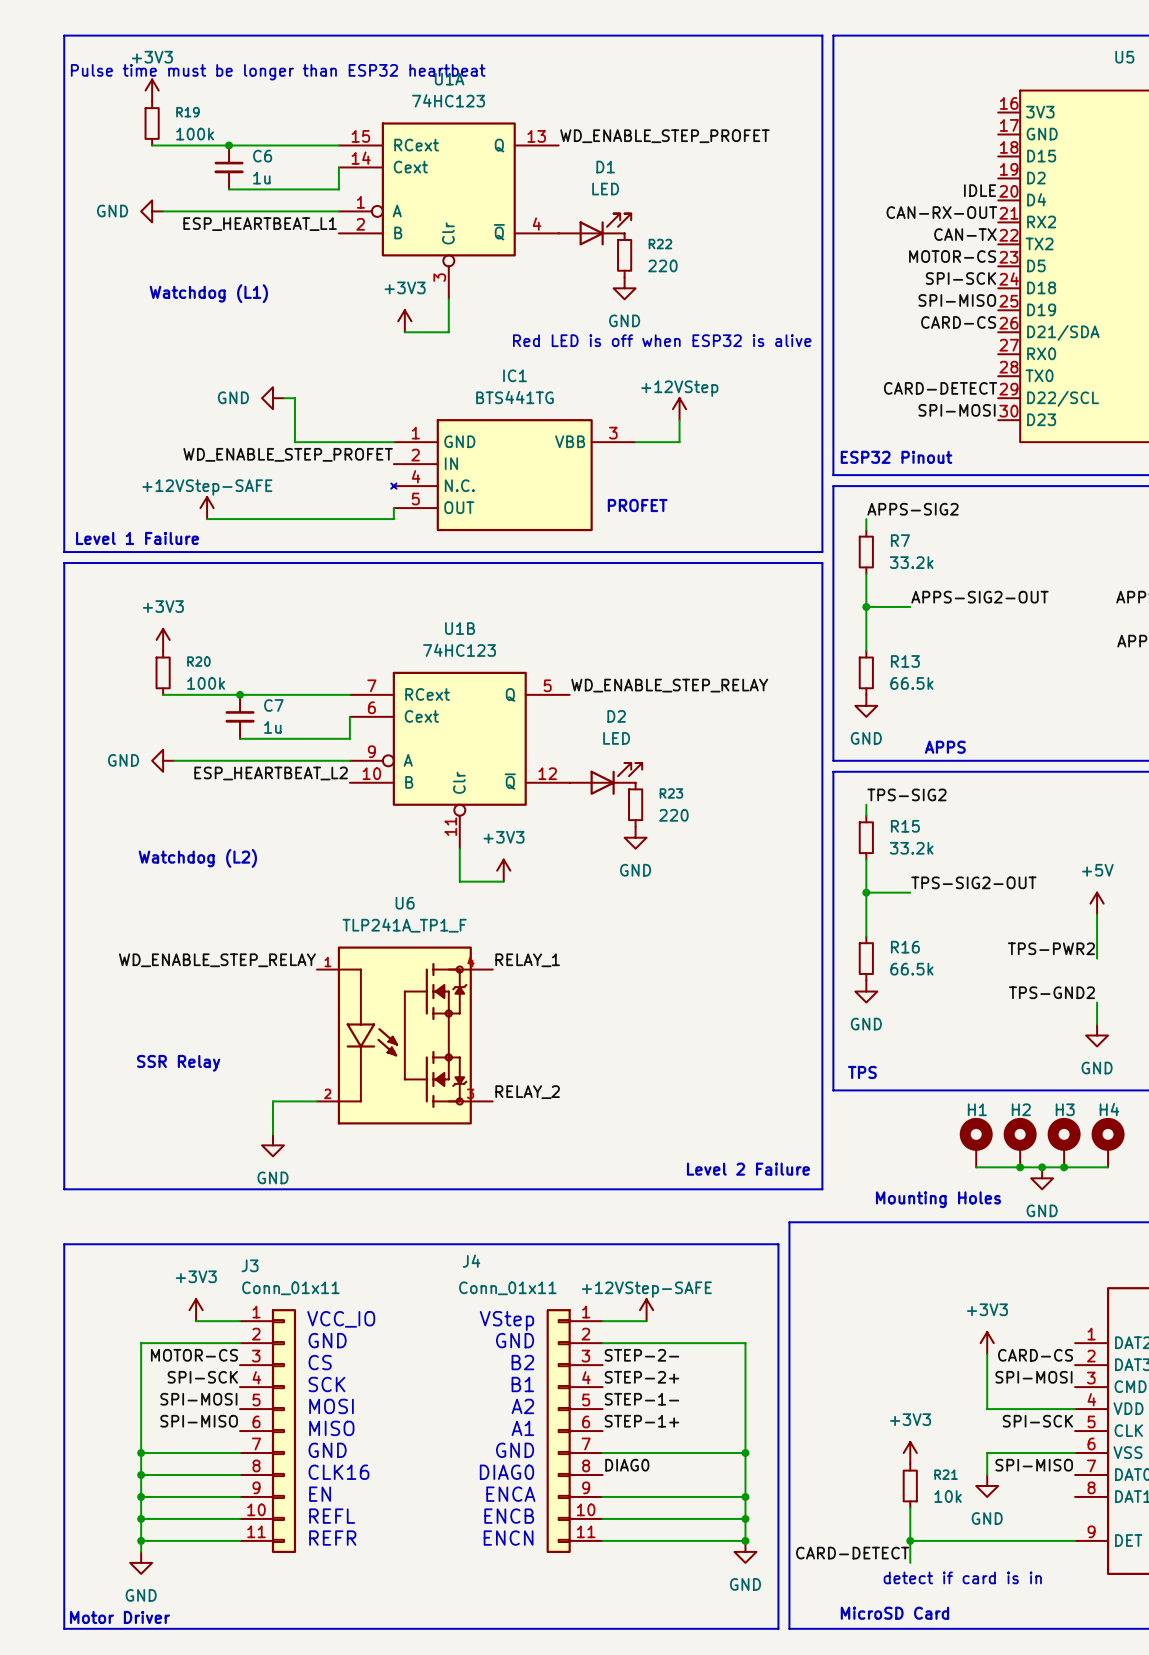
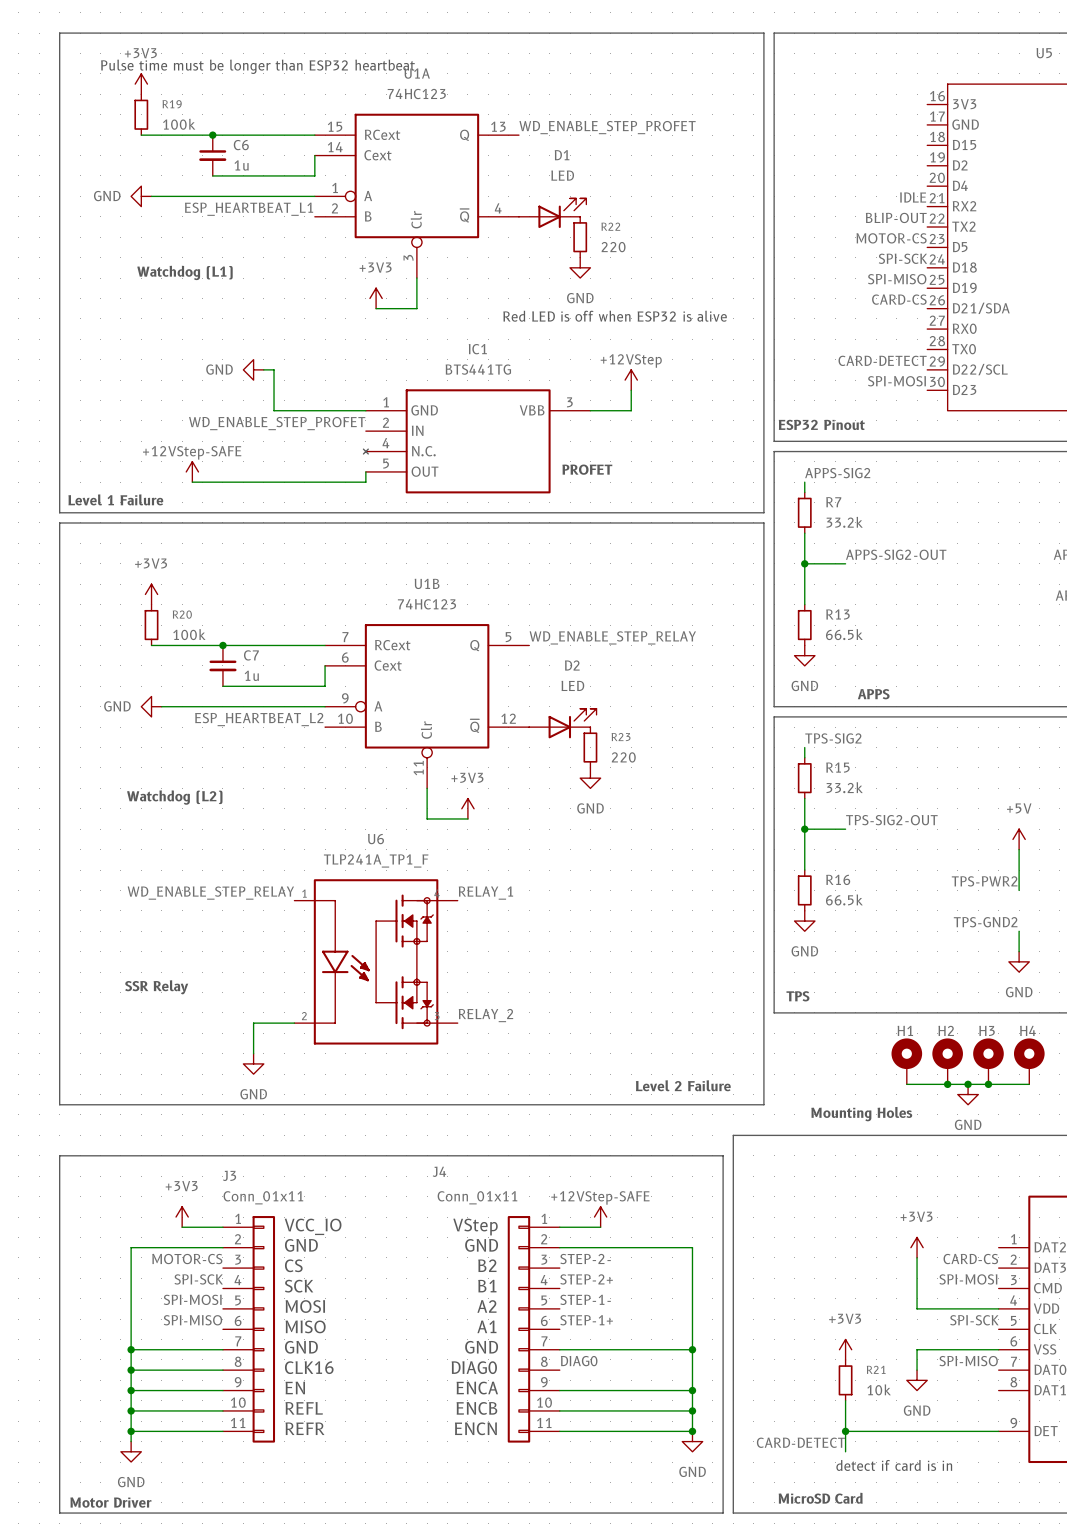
label: IDLE (980, 190) -> none
label: CAN-RX-OUT (941, 212) -> IDLE (913, 197)
label: CAN-TX (965, 234) -> BLIP-OUT (896, 217)

